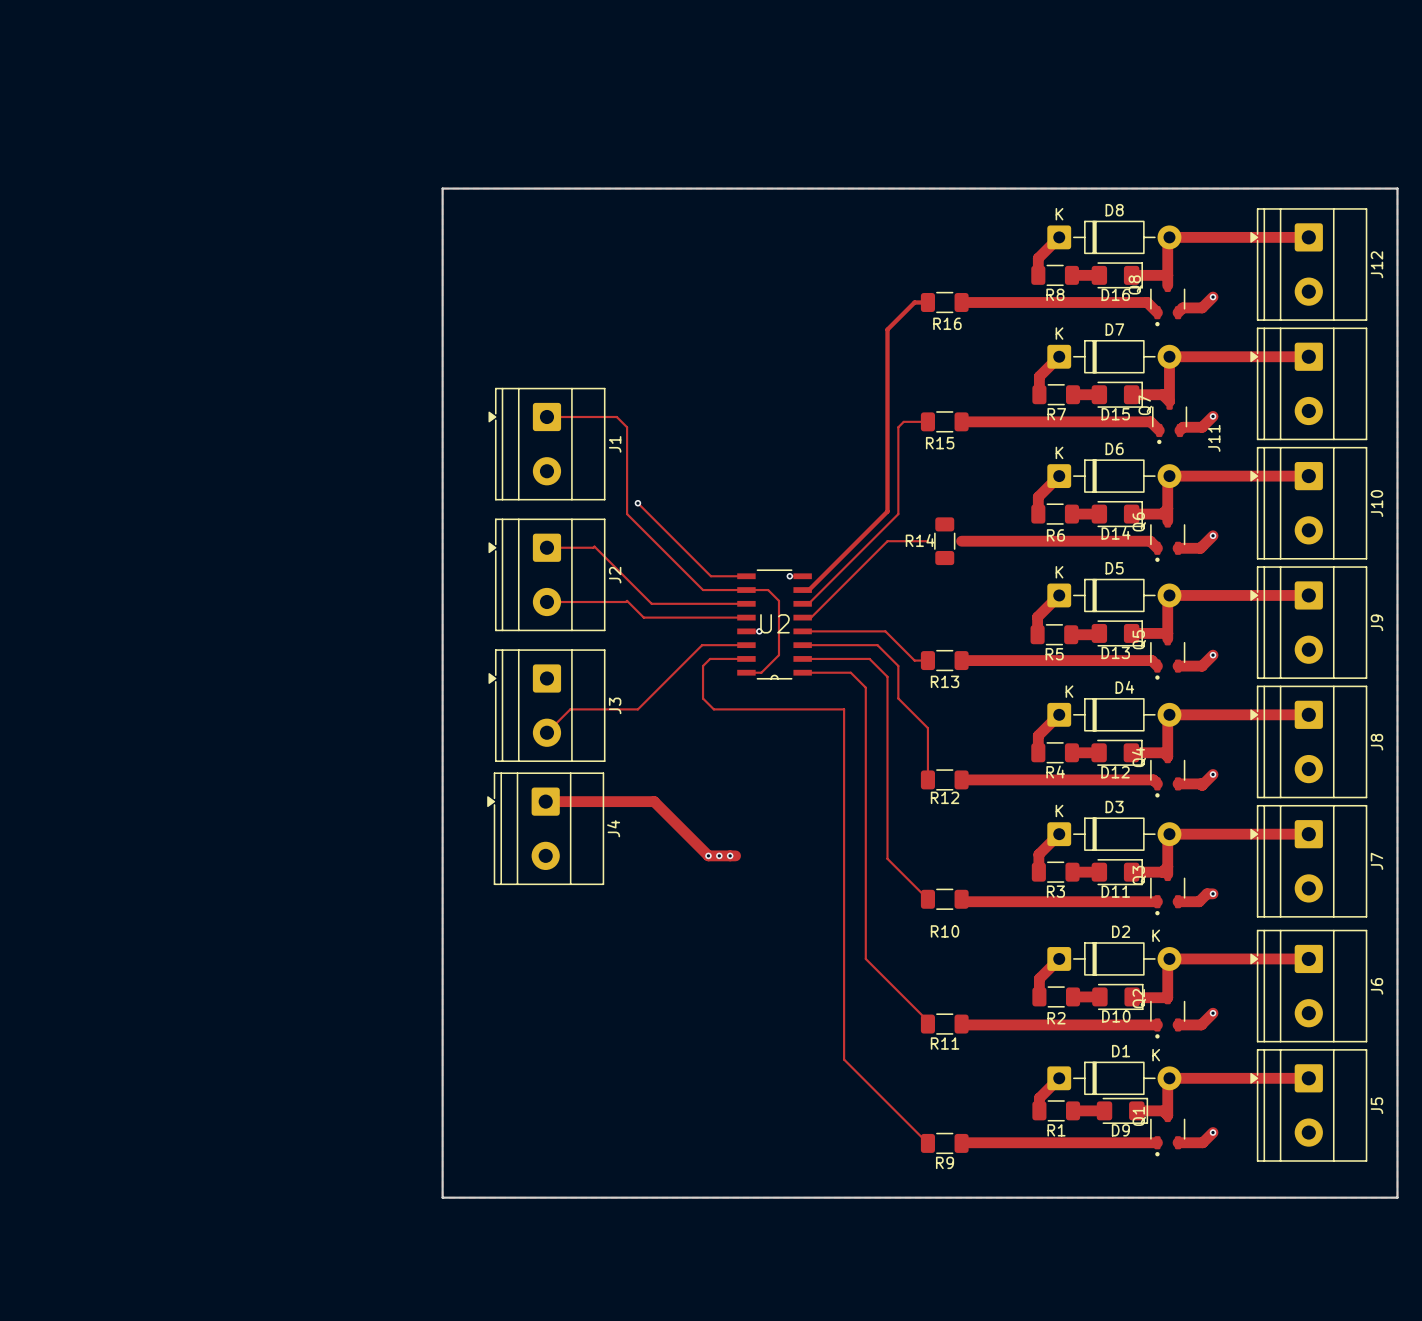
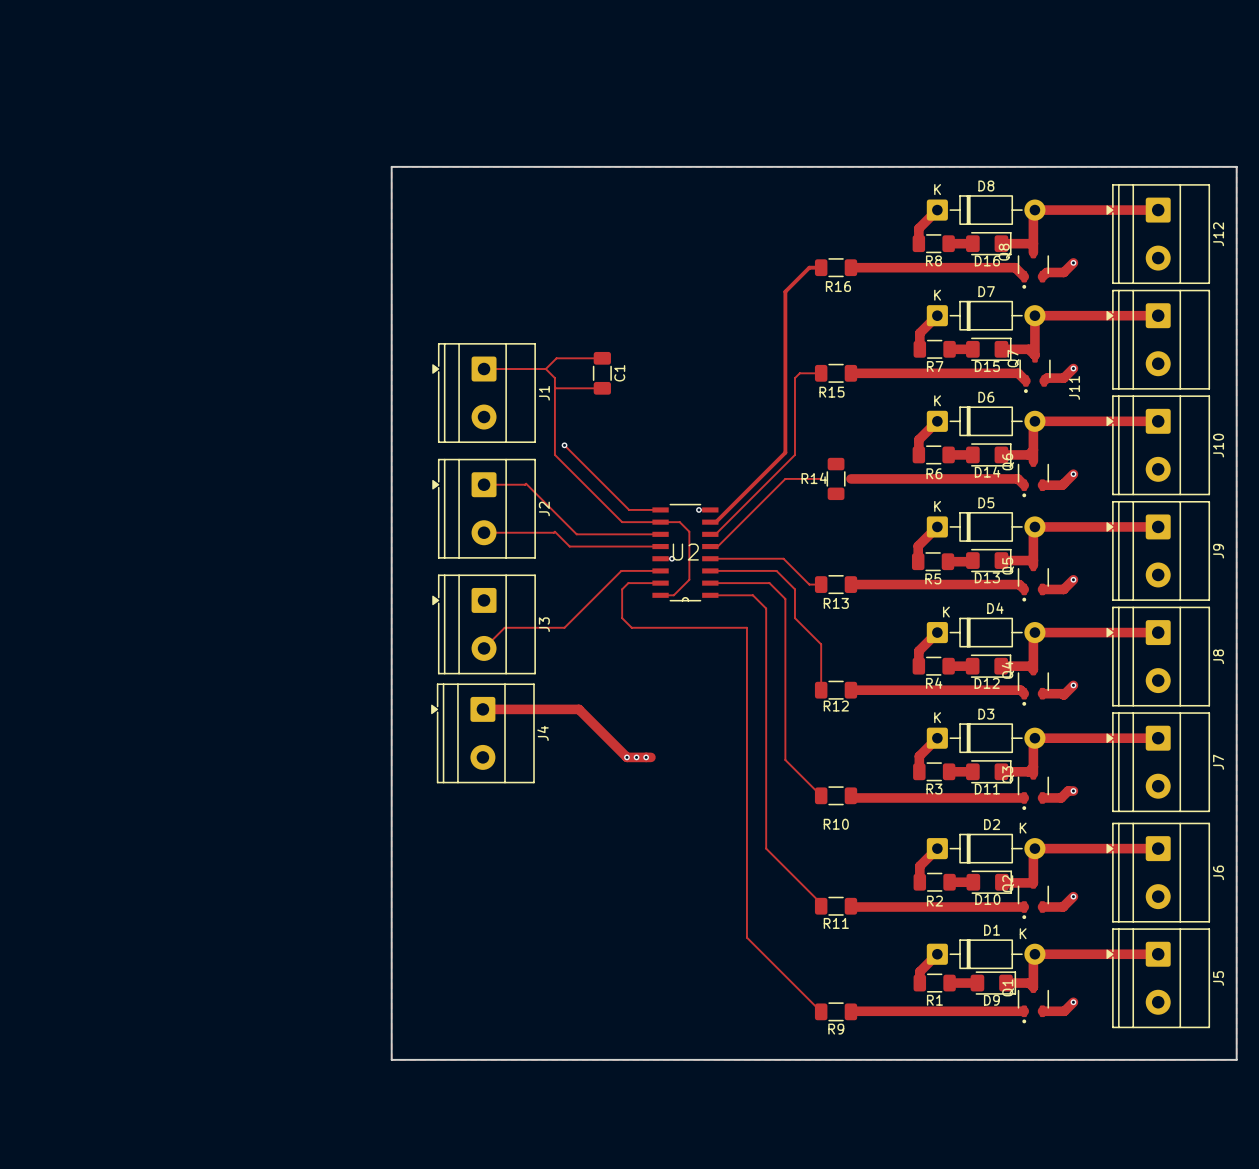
track: none -> (602, 358) (556, 358) (545, 369)
C1: none -> (602, 373)
track: none -> (554, 387) (602, 388)

